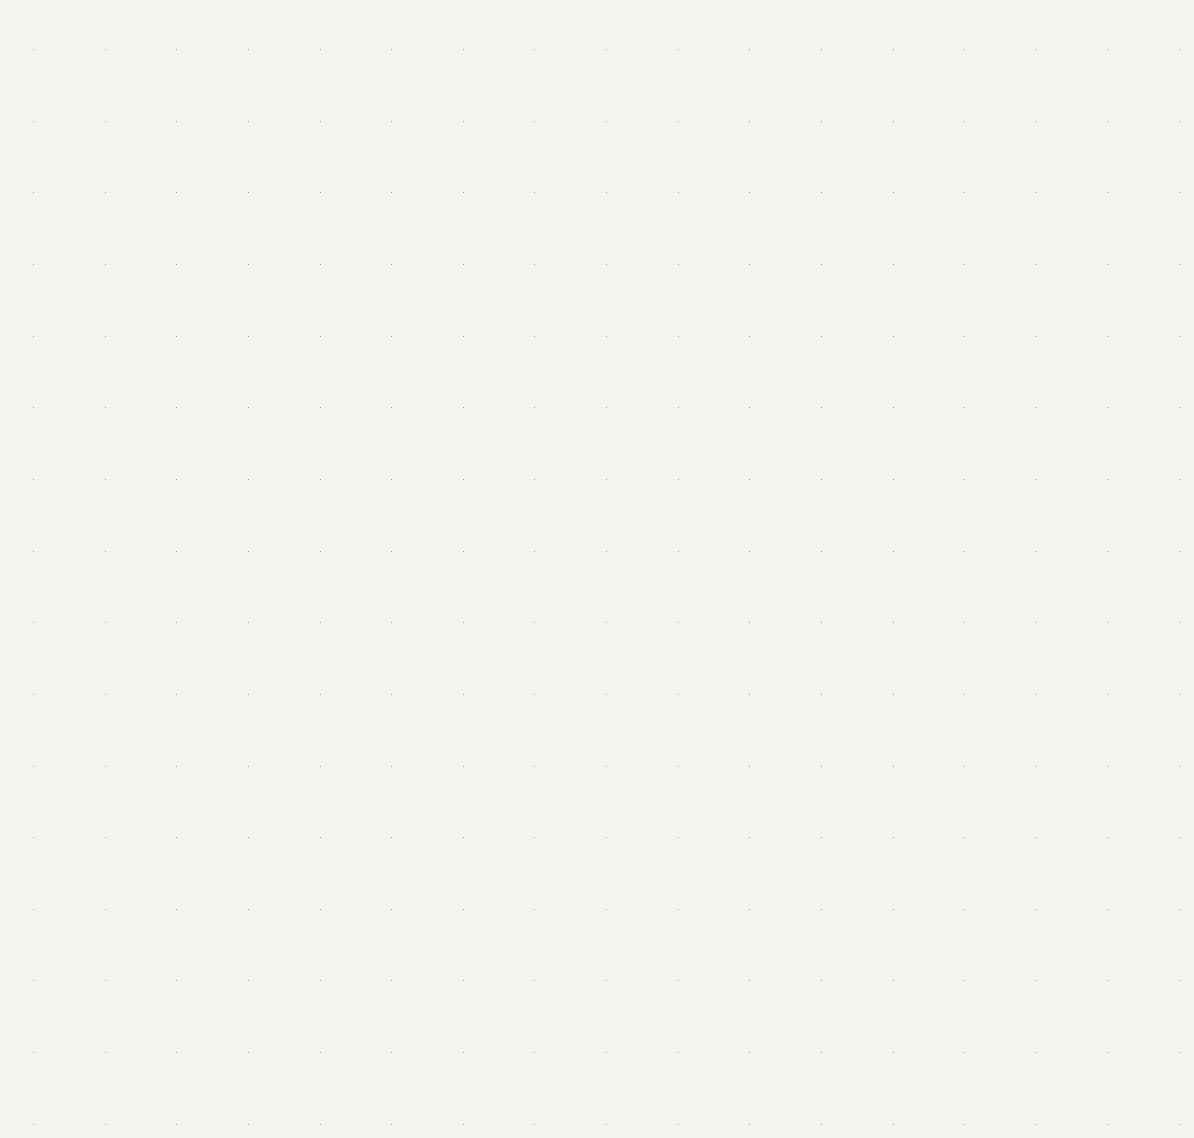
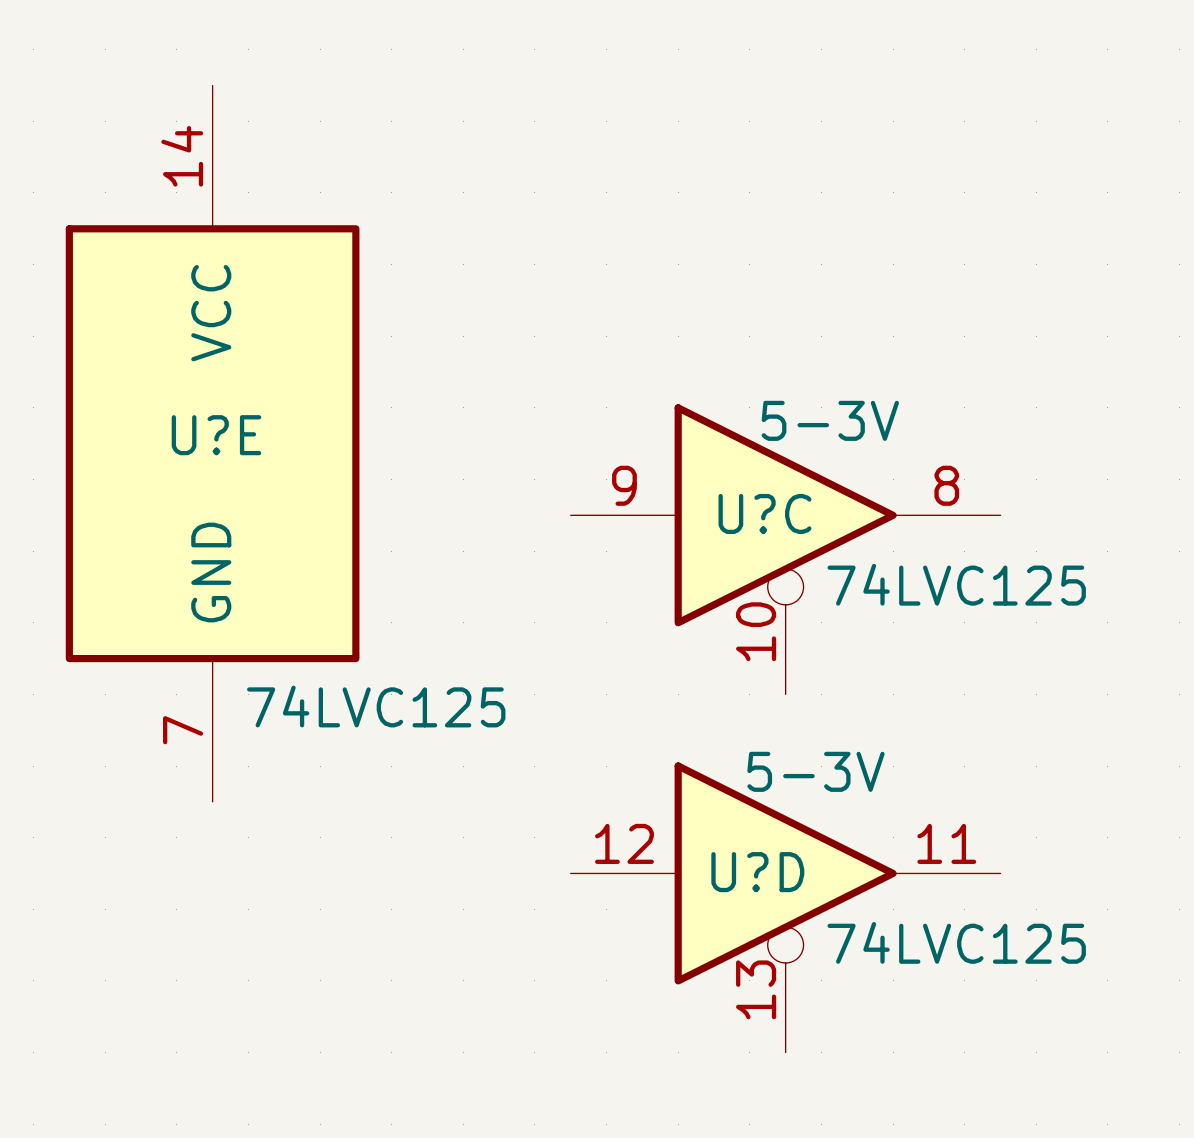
U?E: none -> 74LVC125 (212, 443)
U?C: none -> 74LVC125 (785, 549)
U?D: none -> 74LVC125 (785, 907)

